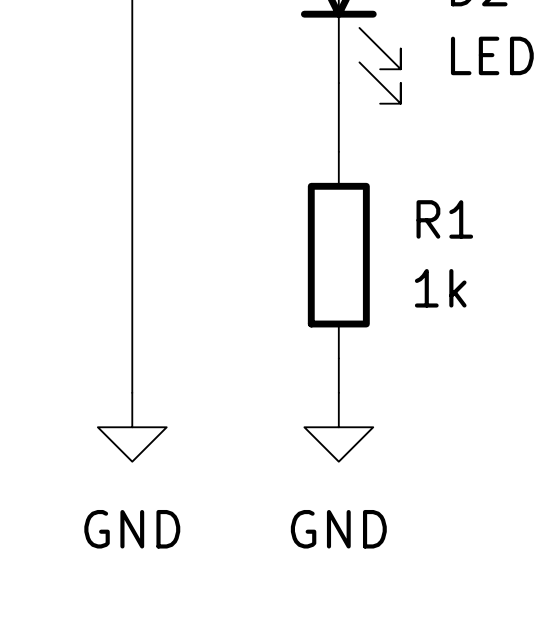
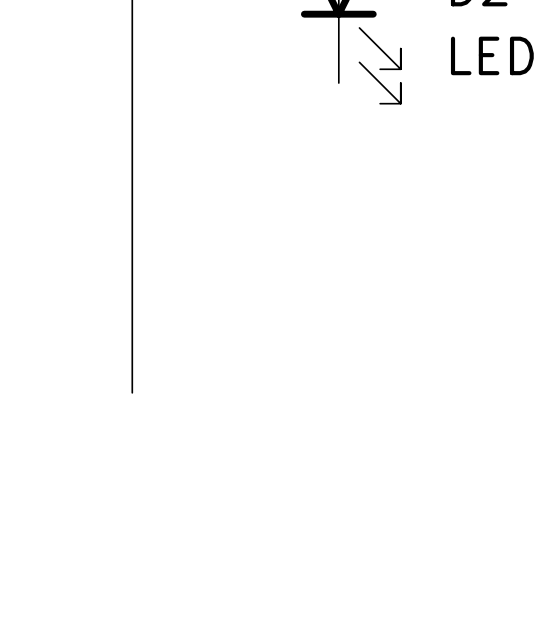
wire: (338, 83) (338, 151) -> none
R1: 1k (338, 255) -> none
wire: (338, 358) (338, 392) -> none
power symbol: GND (132, 427) -> none
power symbol: GND (338, 427) -> none

